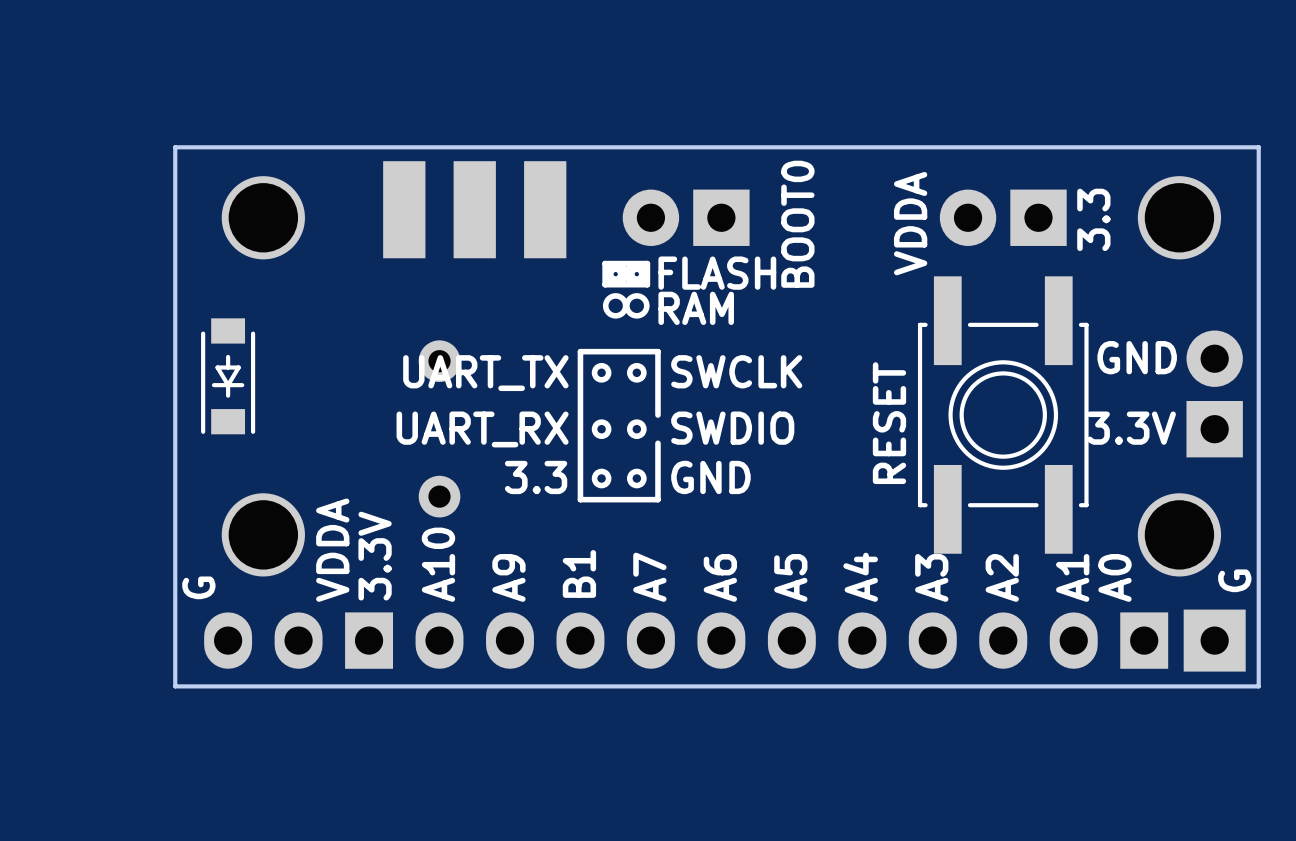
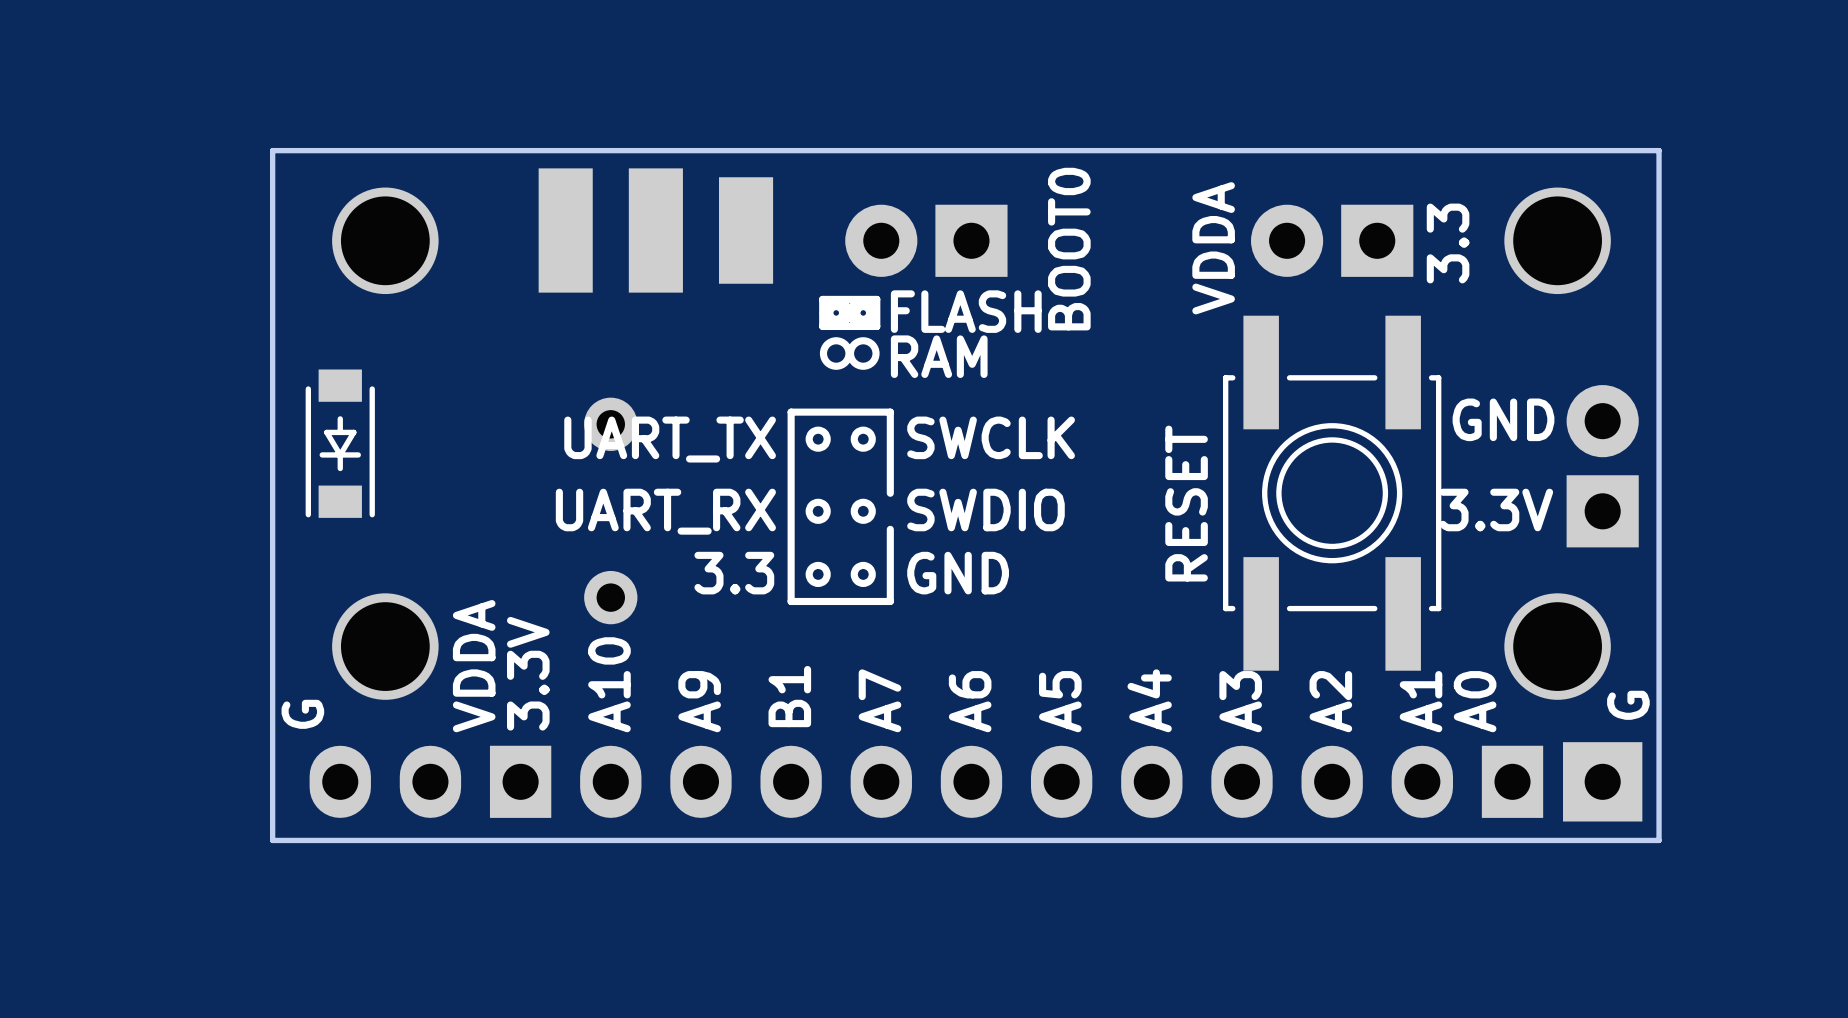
part footprint: [383, 161, 567, 259] -> [538, 168, 774, 293]

